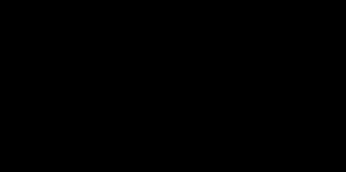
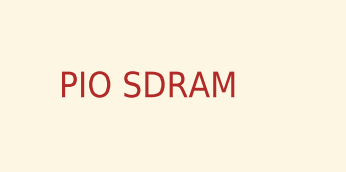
text: none -> PIO SDRAM (148, 84)

